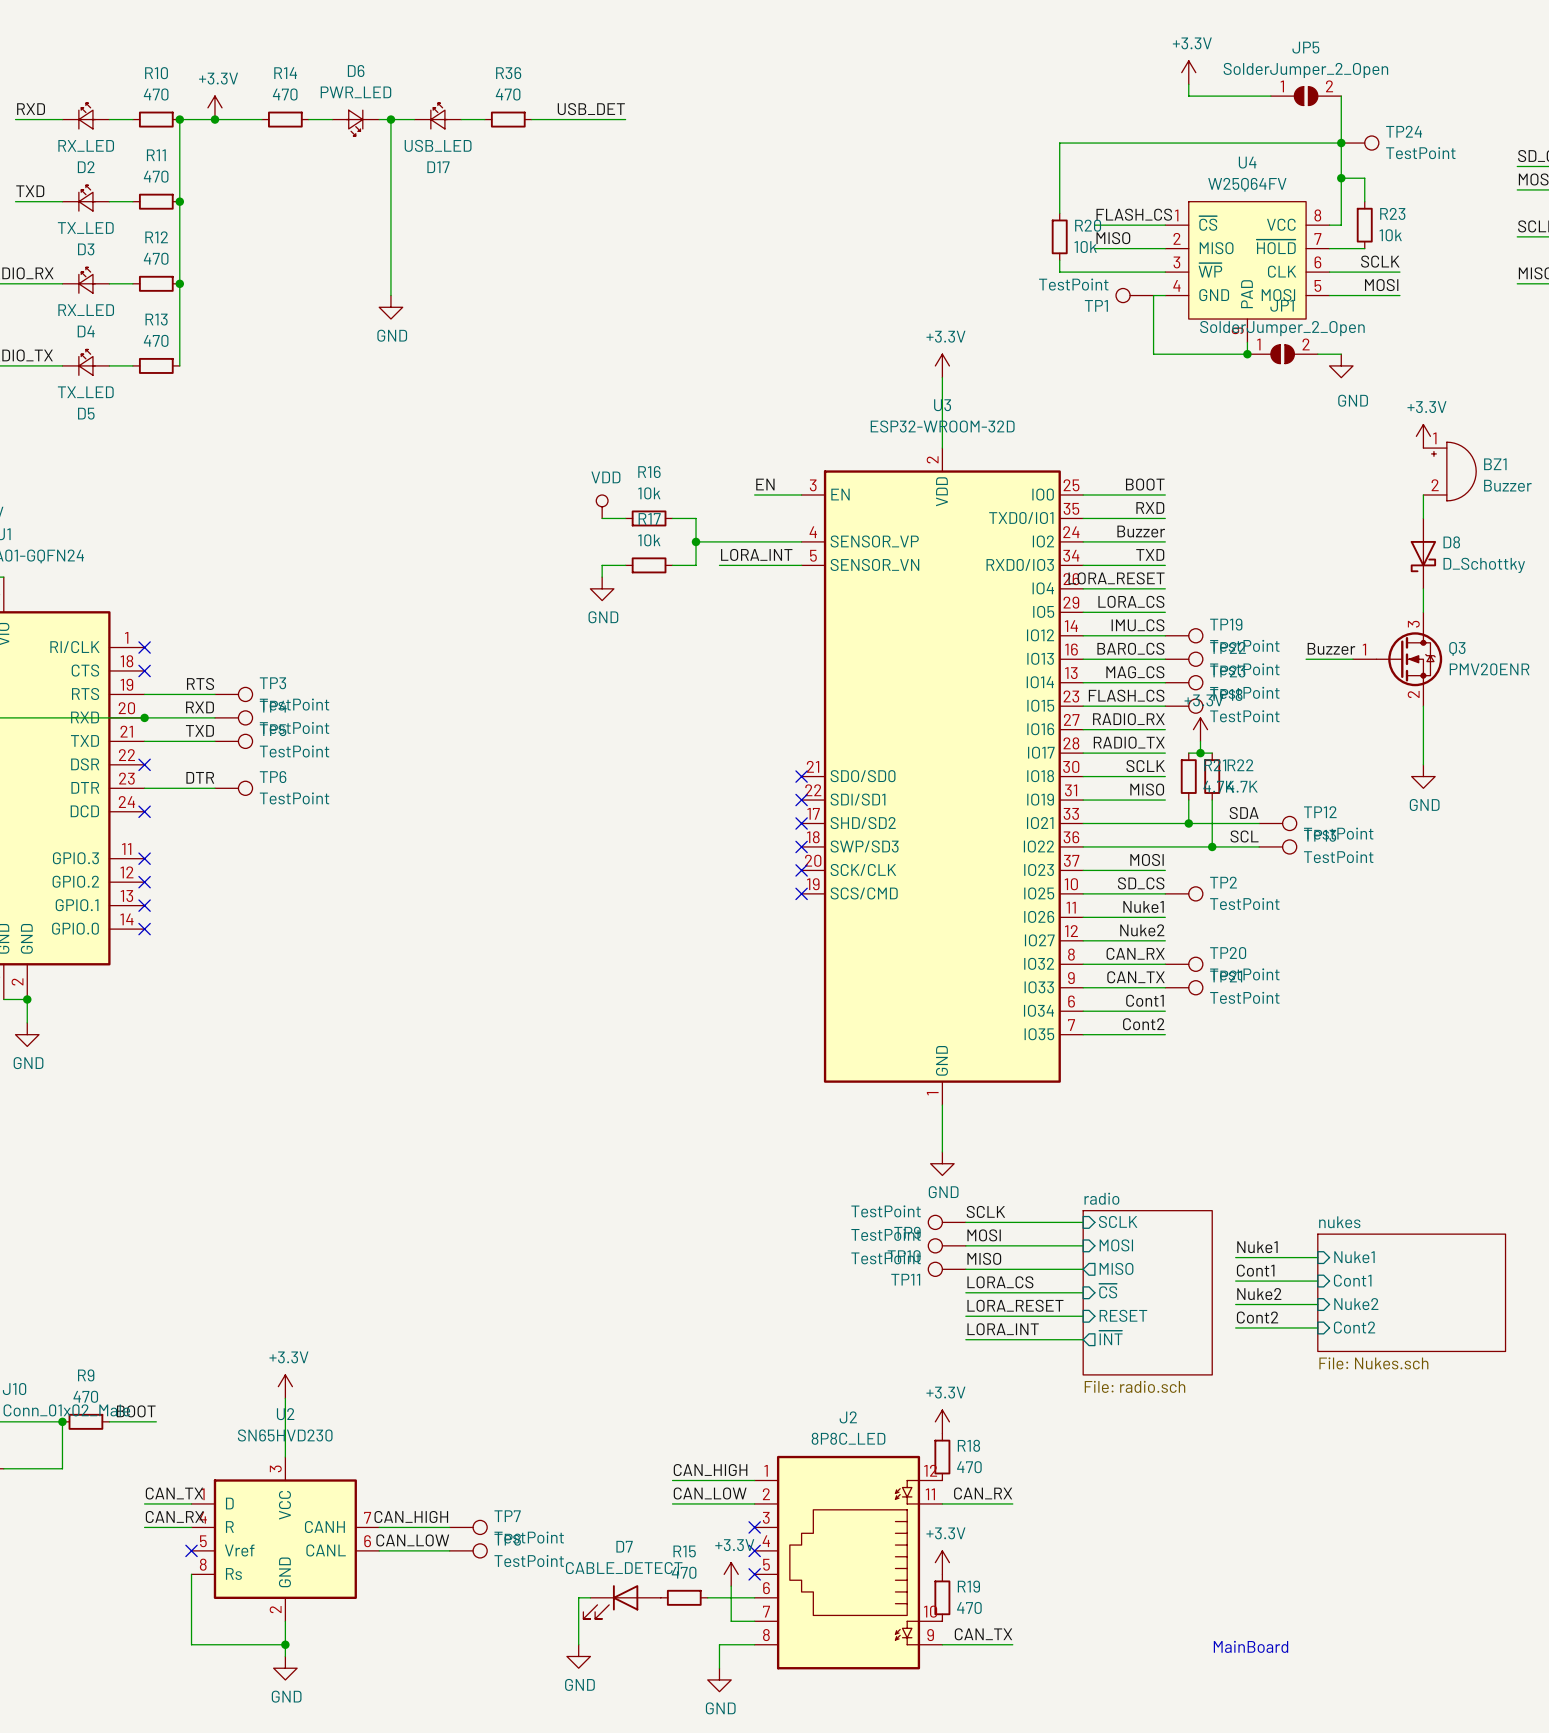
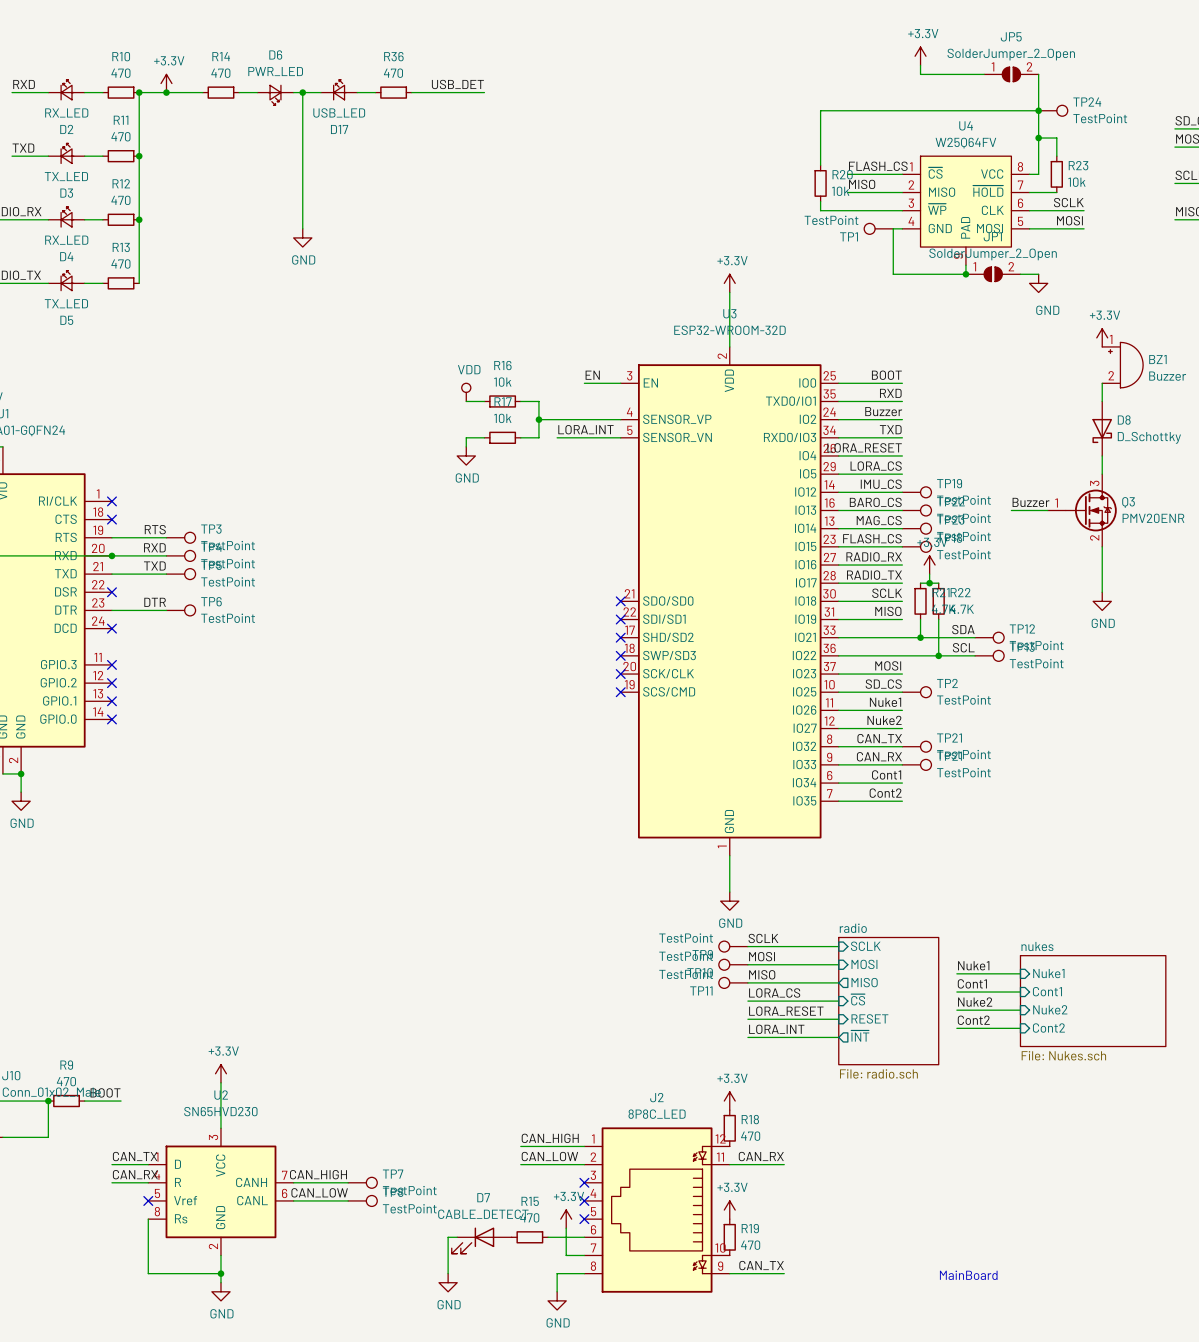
label: CAN_RX (1135, 953) -> CAN_TX (879, 738)
TP20 name: TP20 (1228, 953) -> TP21 (949, 737)
label: CAN_TX (1135, 977) -> CAN_RX (879, 756)

